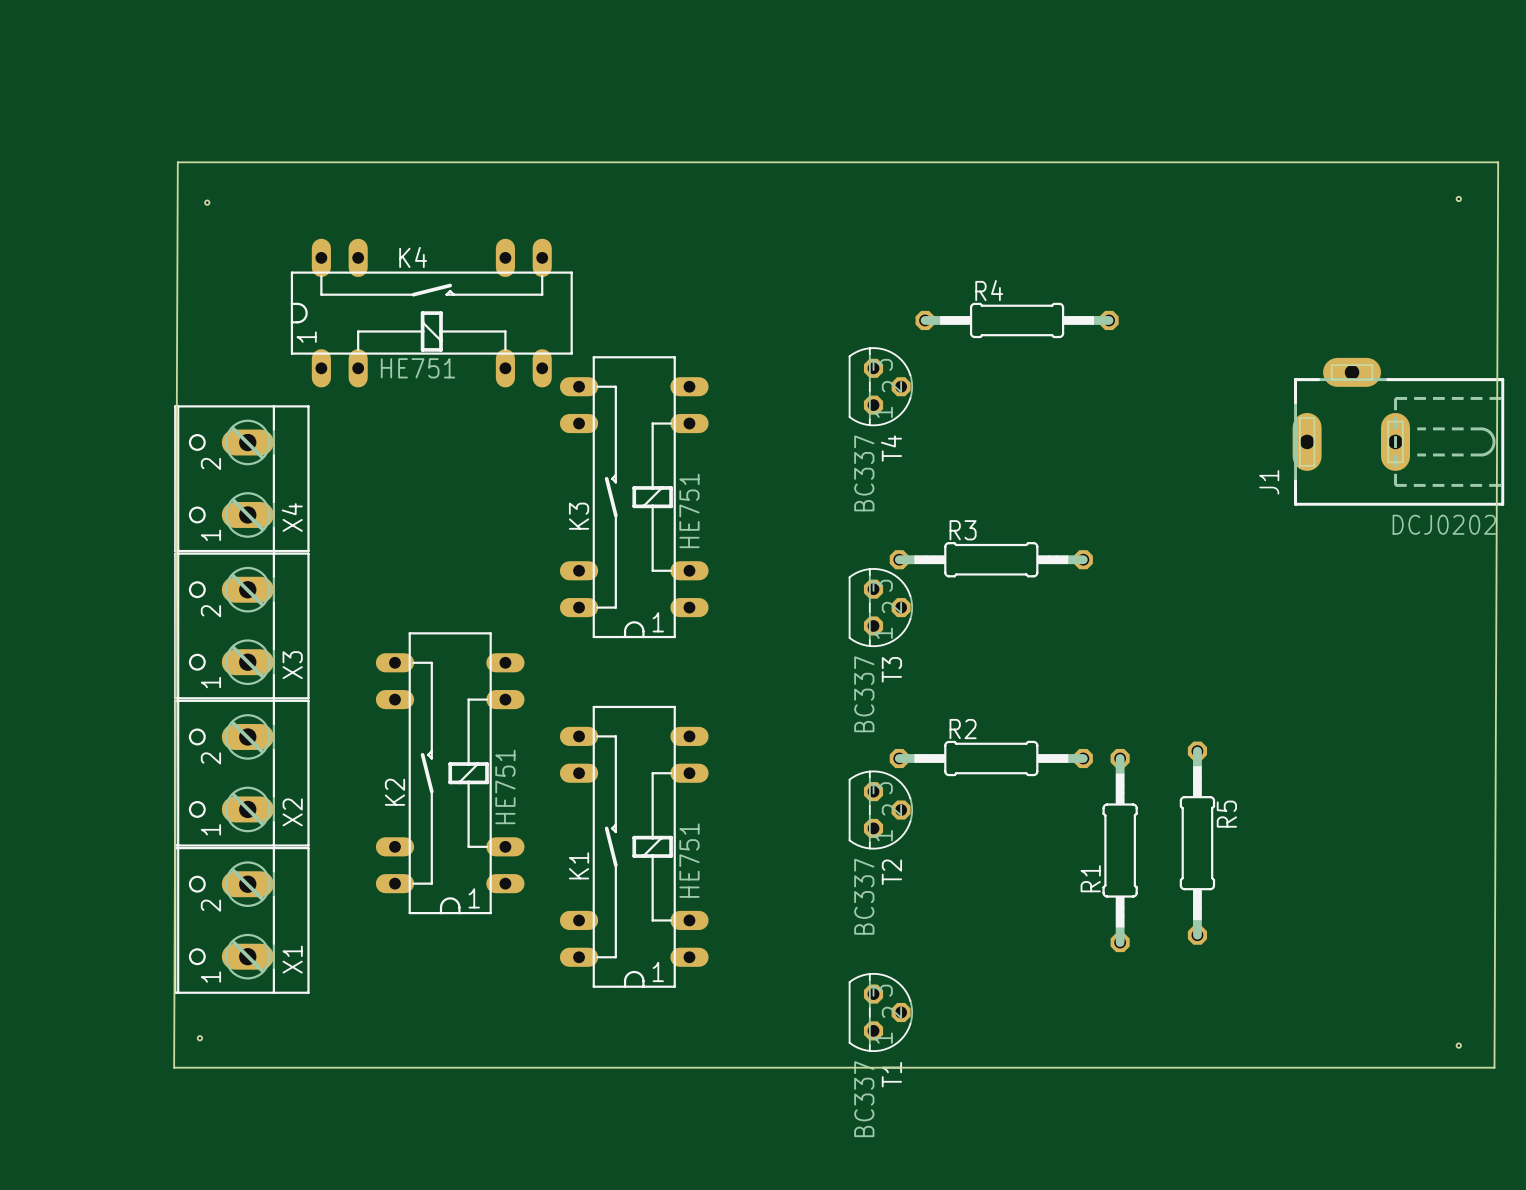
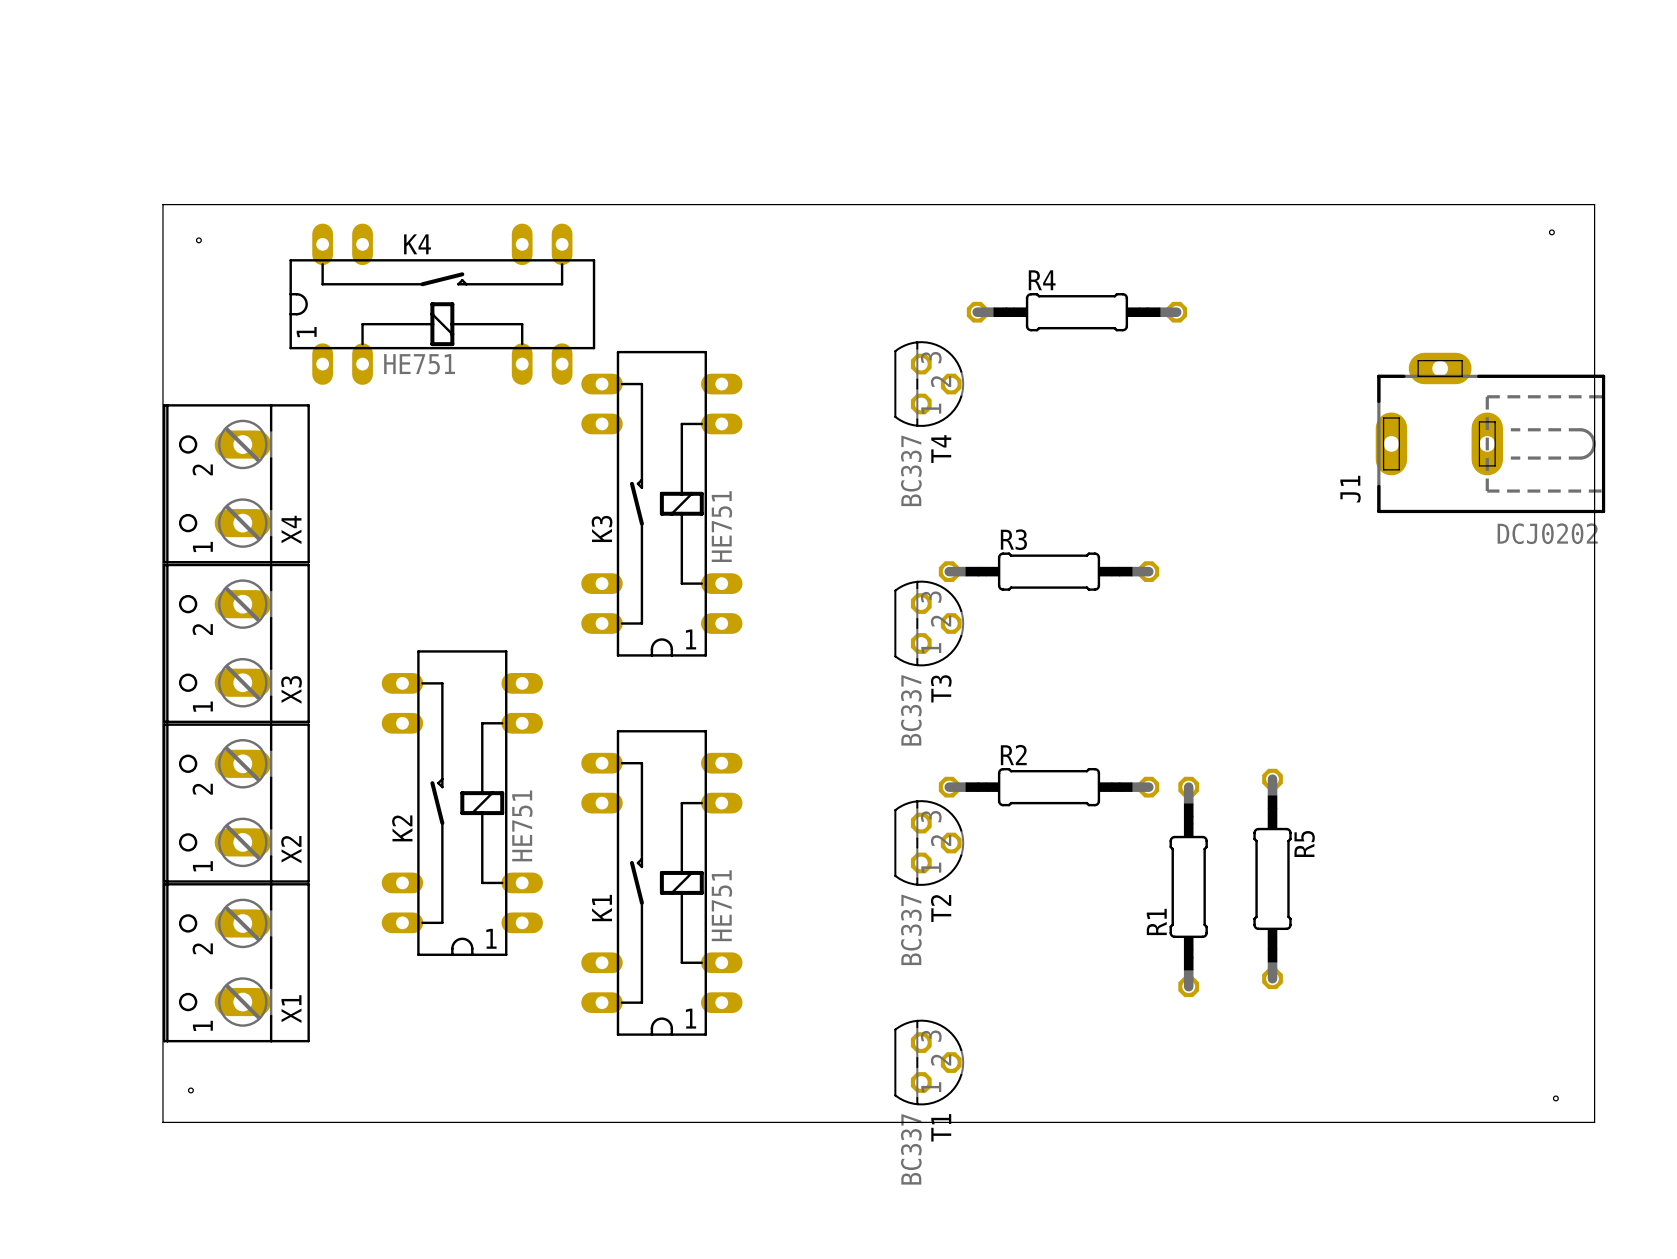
hole position: (1458, 198) -> (1551, 232)
hole position: (207, 202) -> (198, 240)
board edge: (174, 1067) (177, 162) (1498, 162) (1494, 1067) -> (162, 1122) (162, 204) (1594, 204) (1594, 1122)

